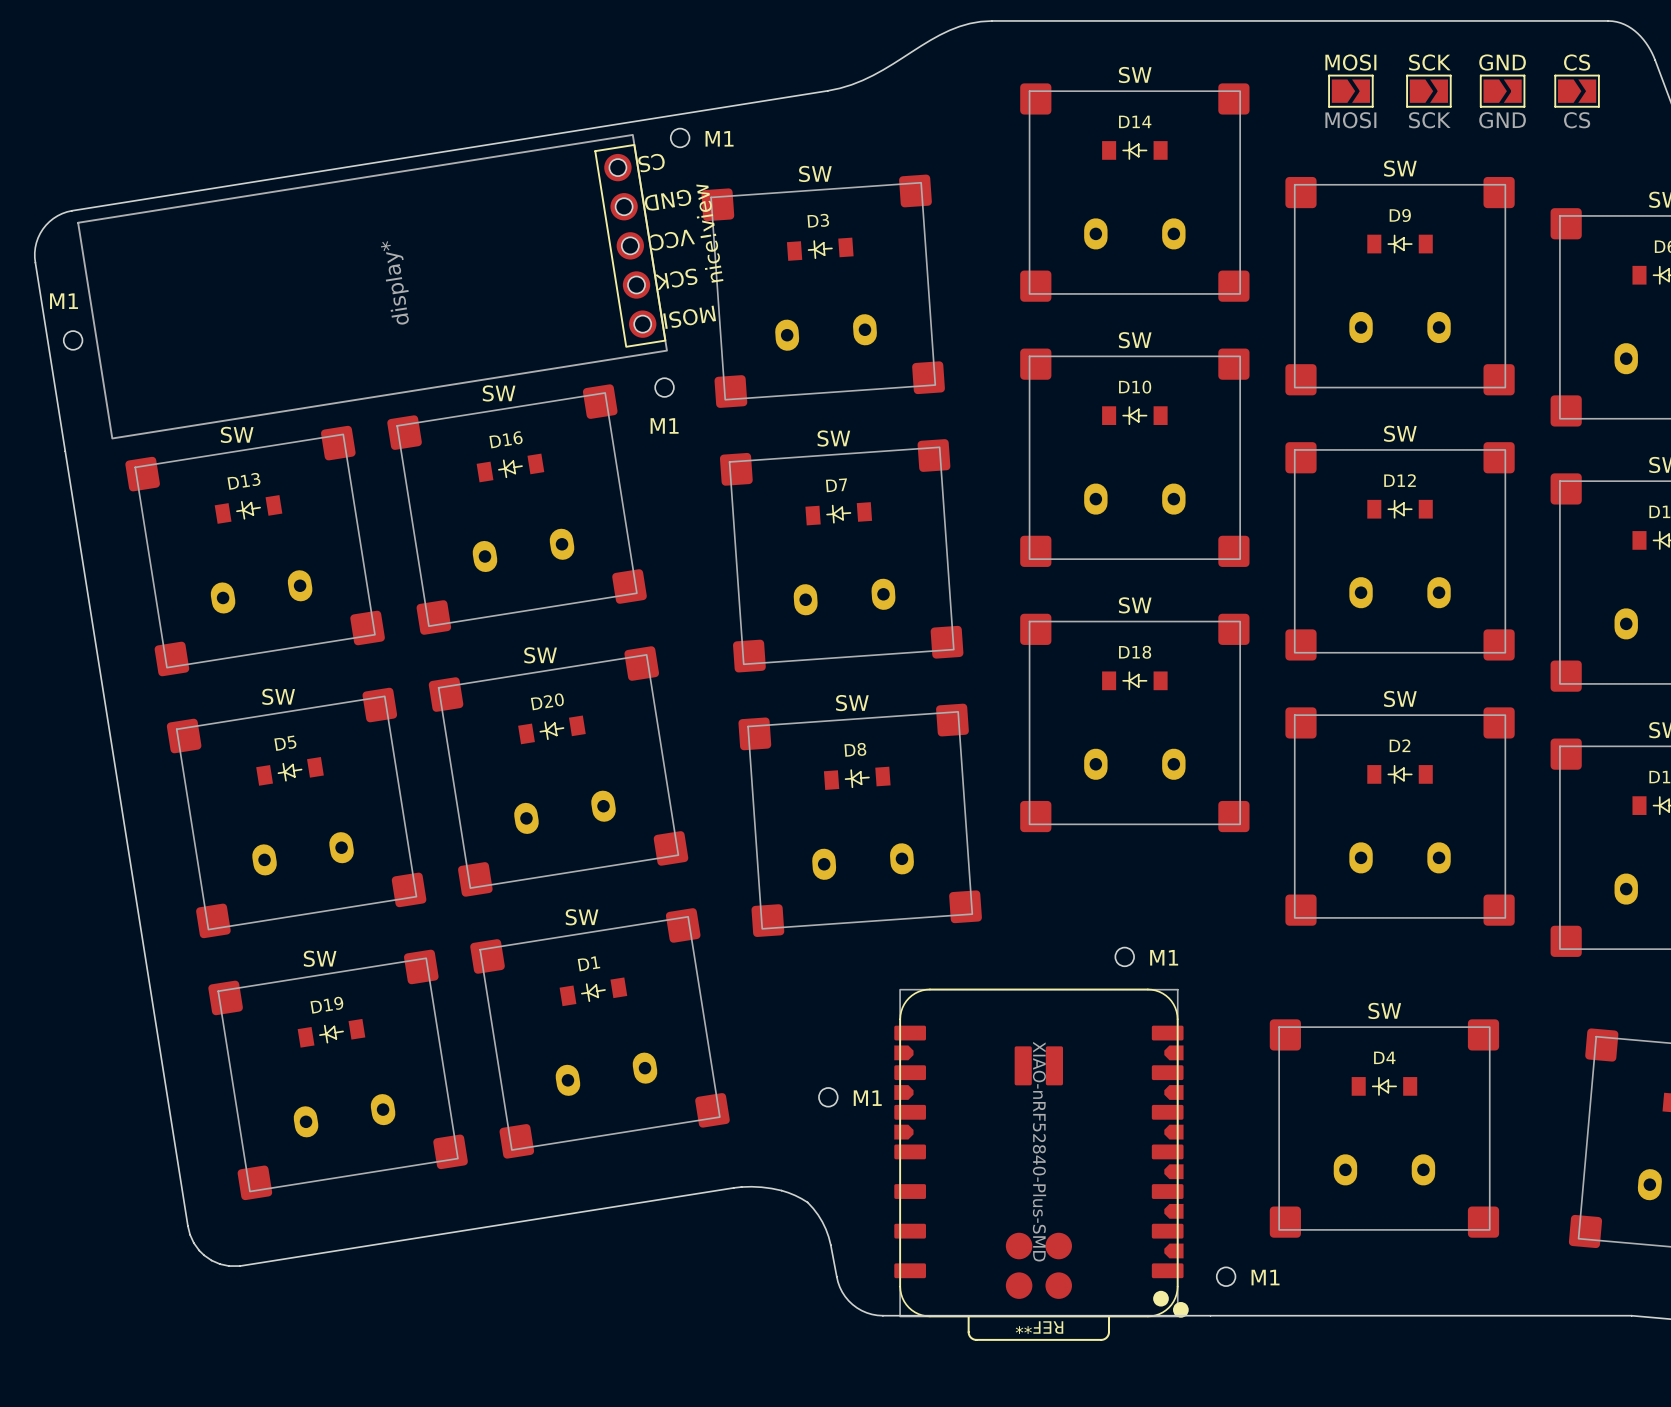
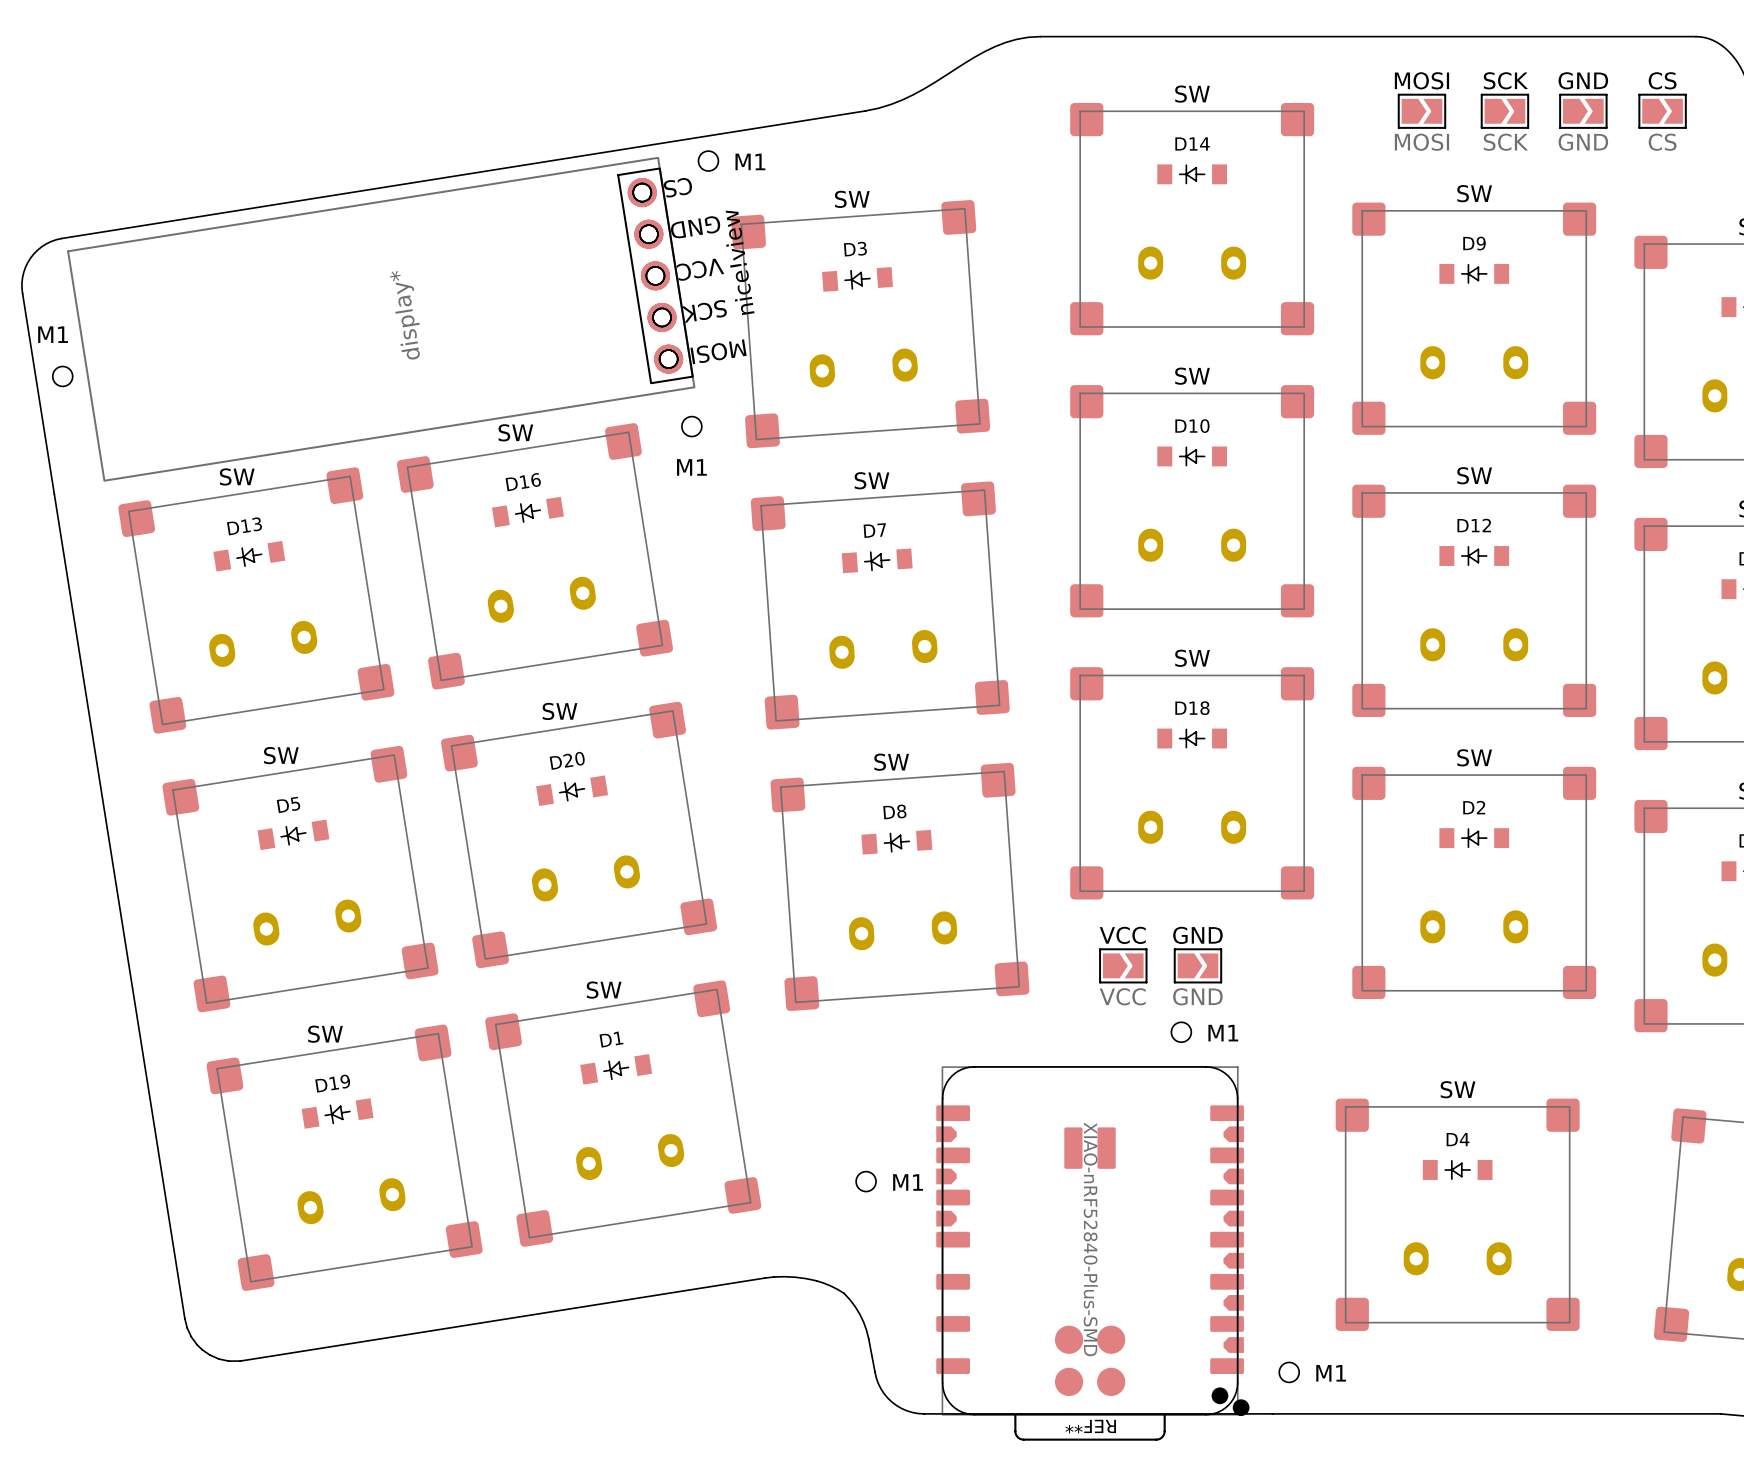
part: none -> (655, 275)
VCC: none -> VCC (1123, 965)
GND: none -> GND (1197, 965)

